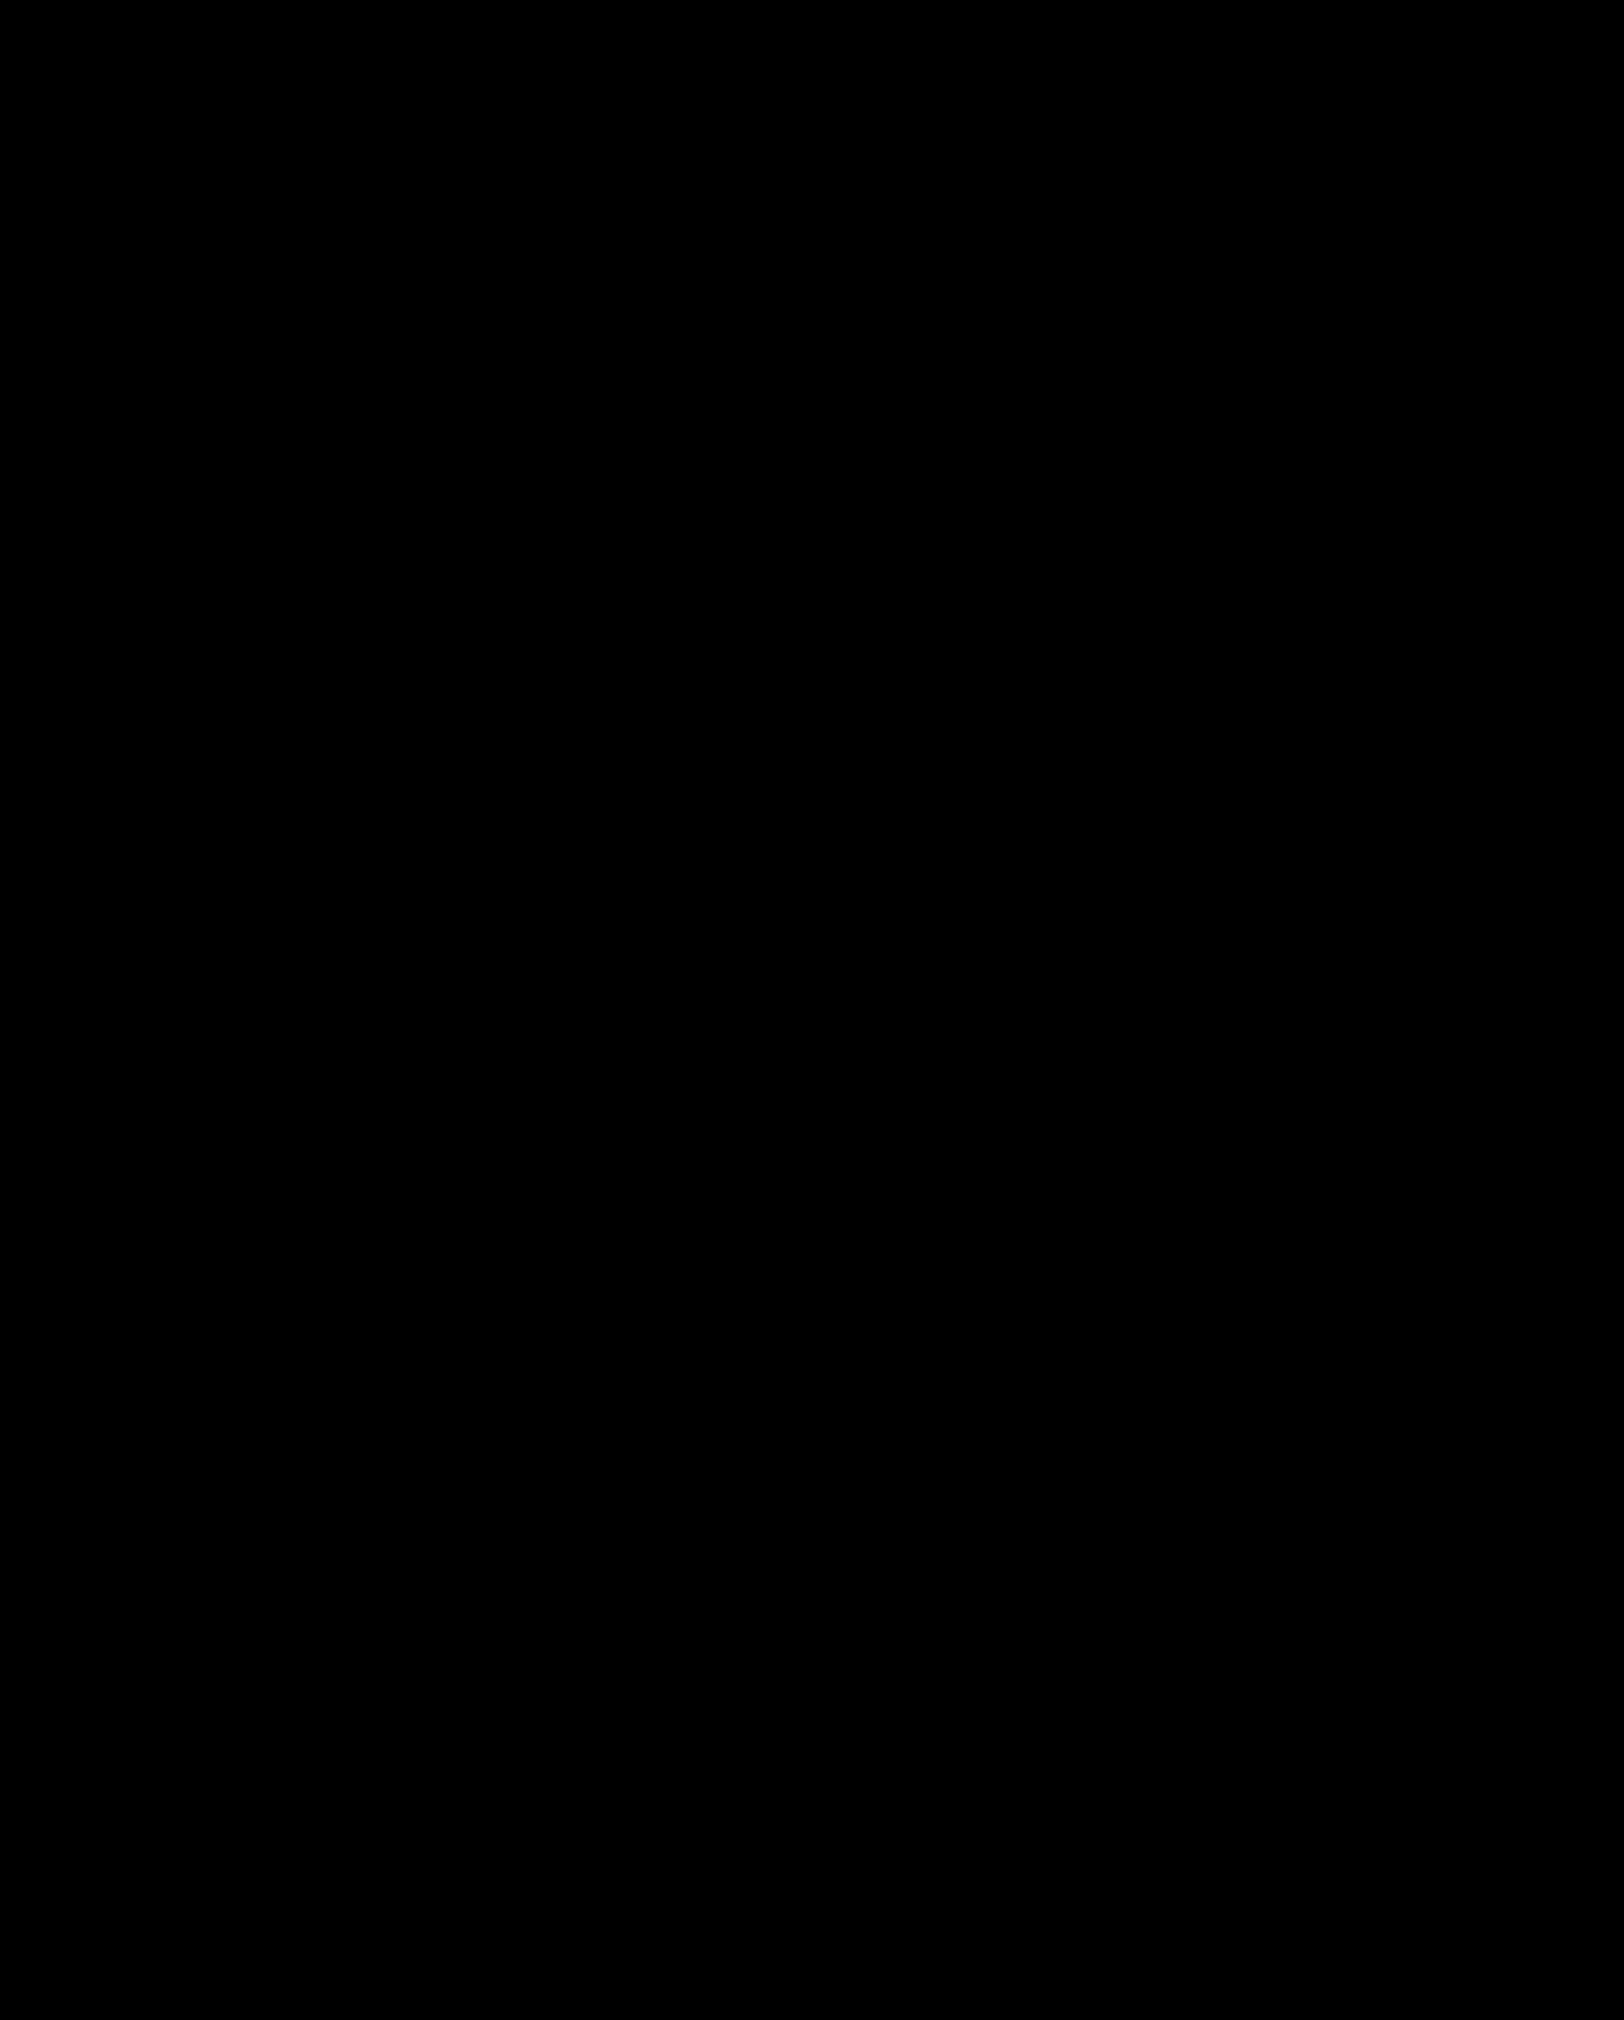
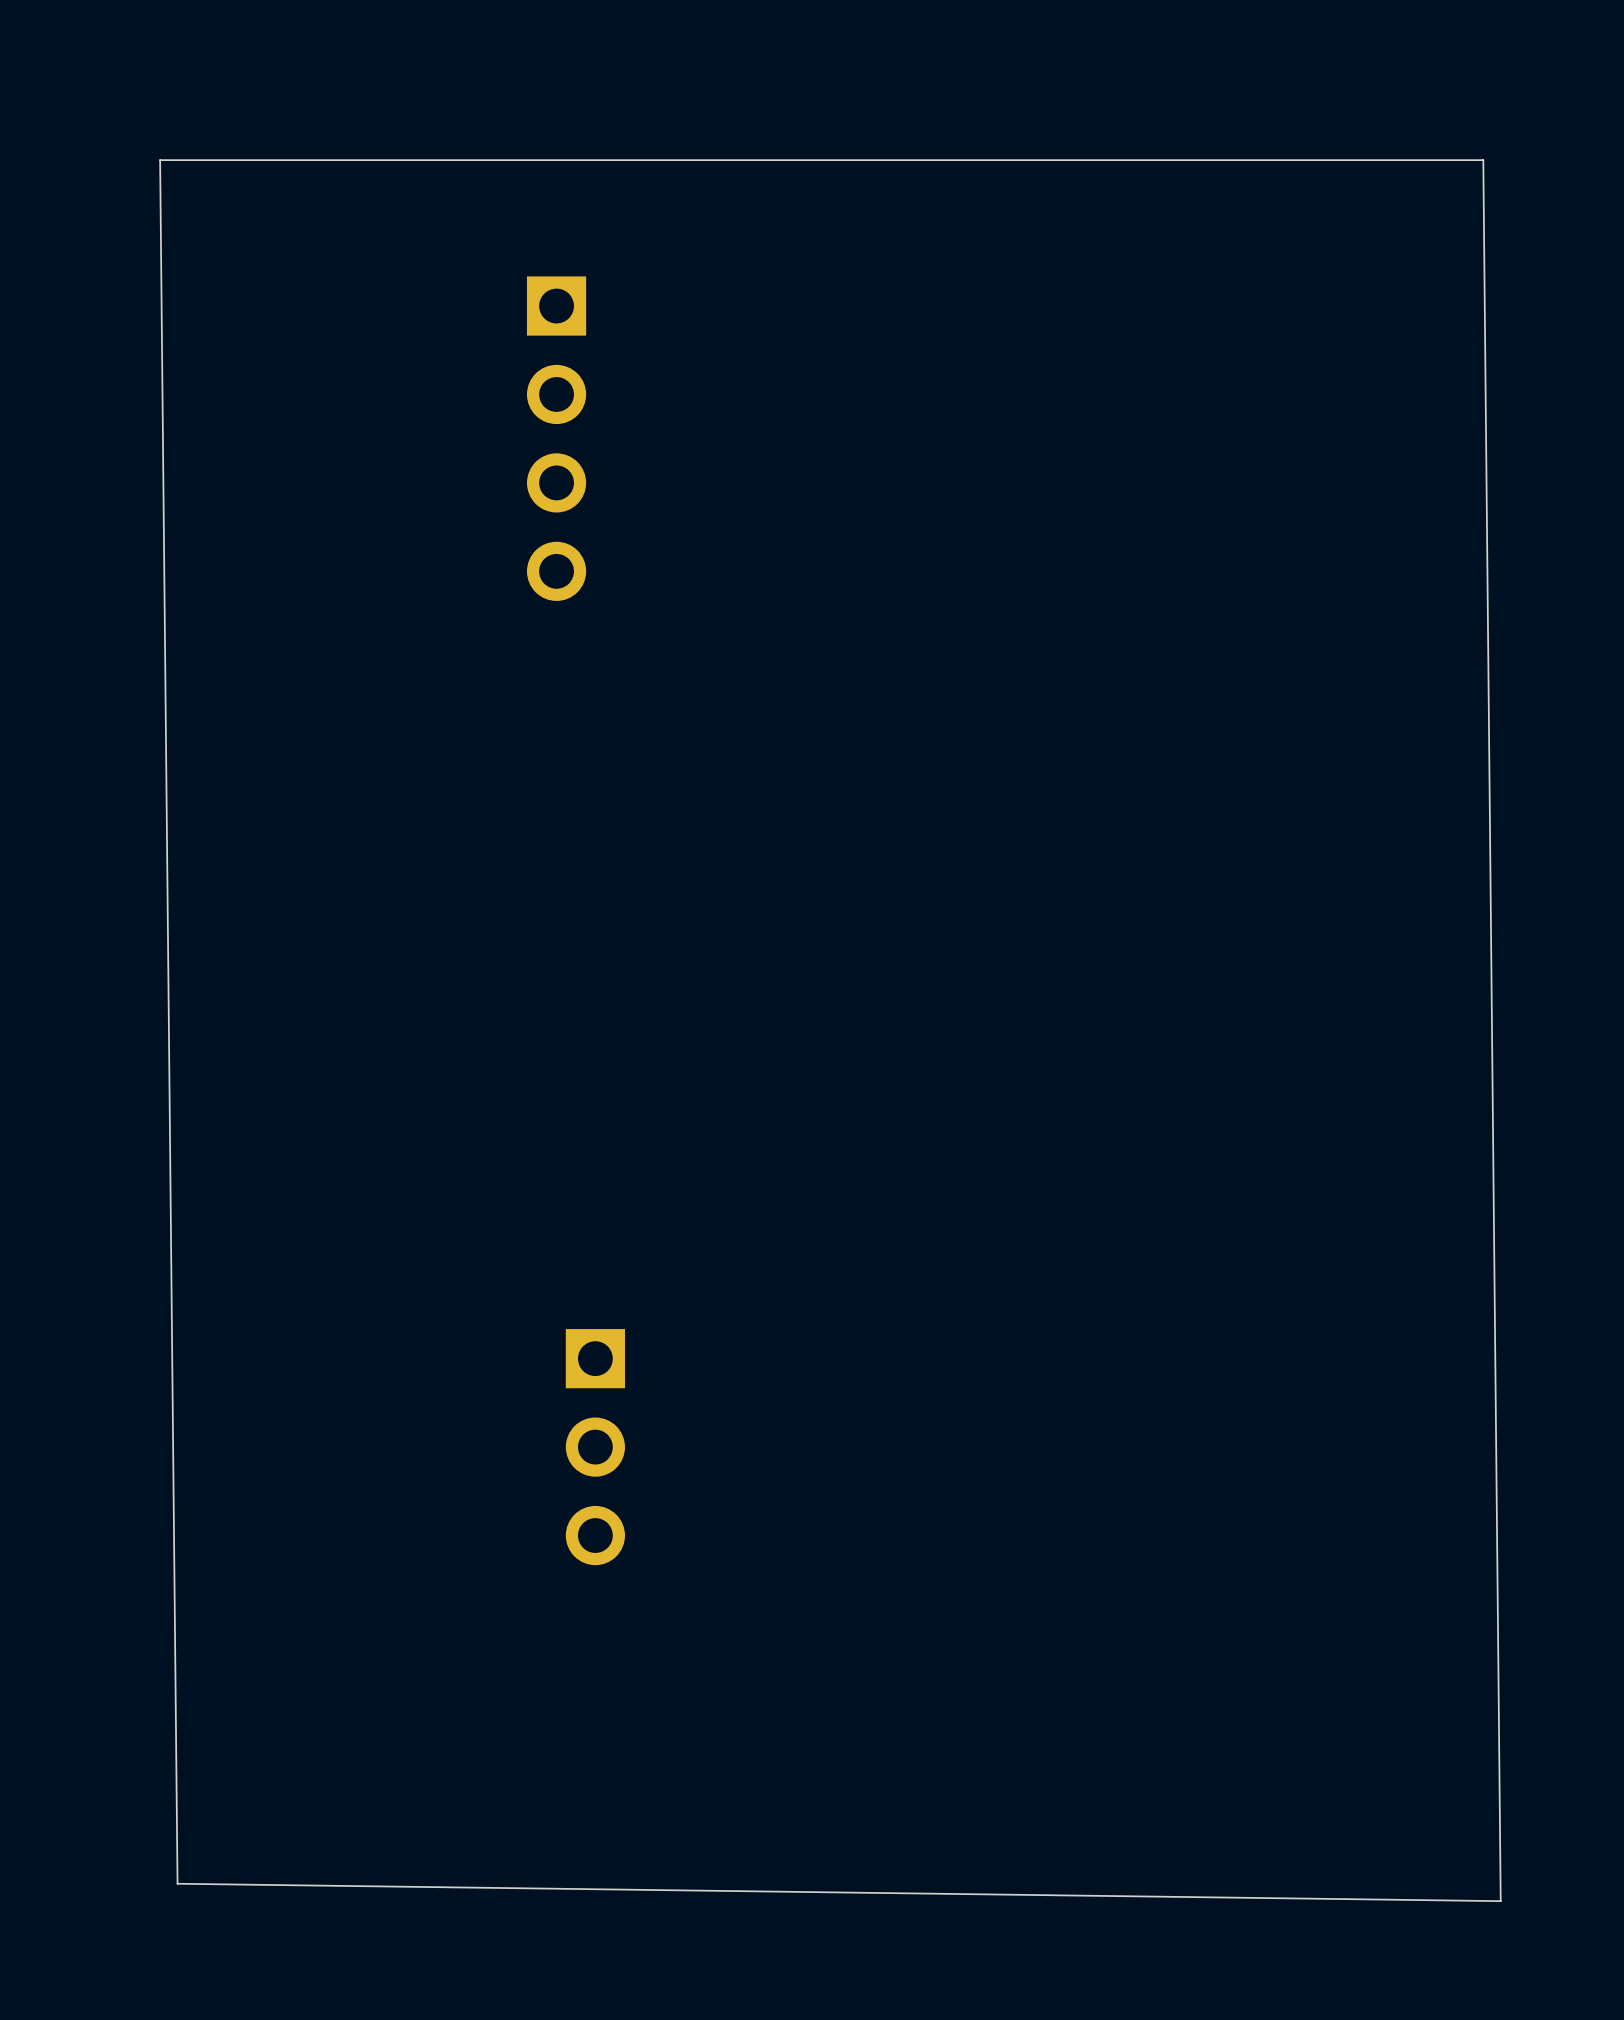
board edge: none -> (1483, 160) (1500, 1901) (177, 1883) (160, 160) (1483, 160)
part: none -> (556, 438)
part: none -> (595, 1447)

